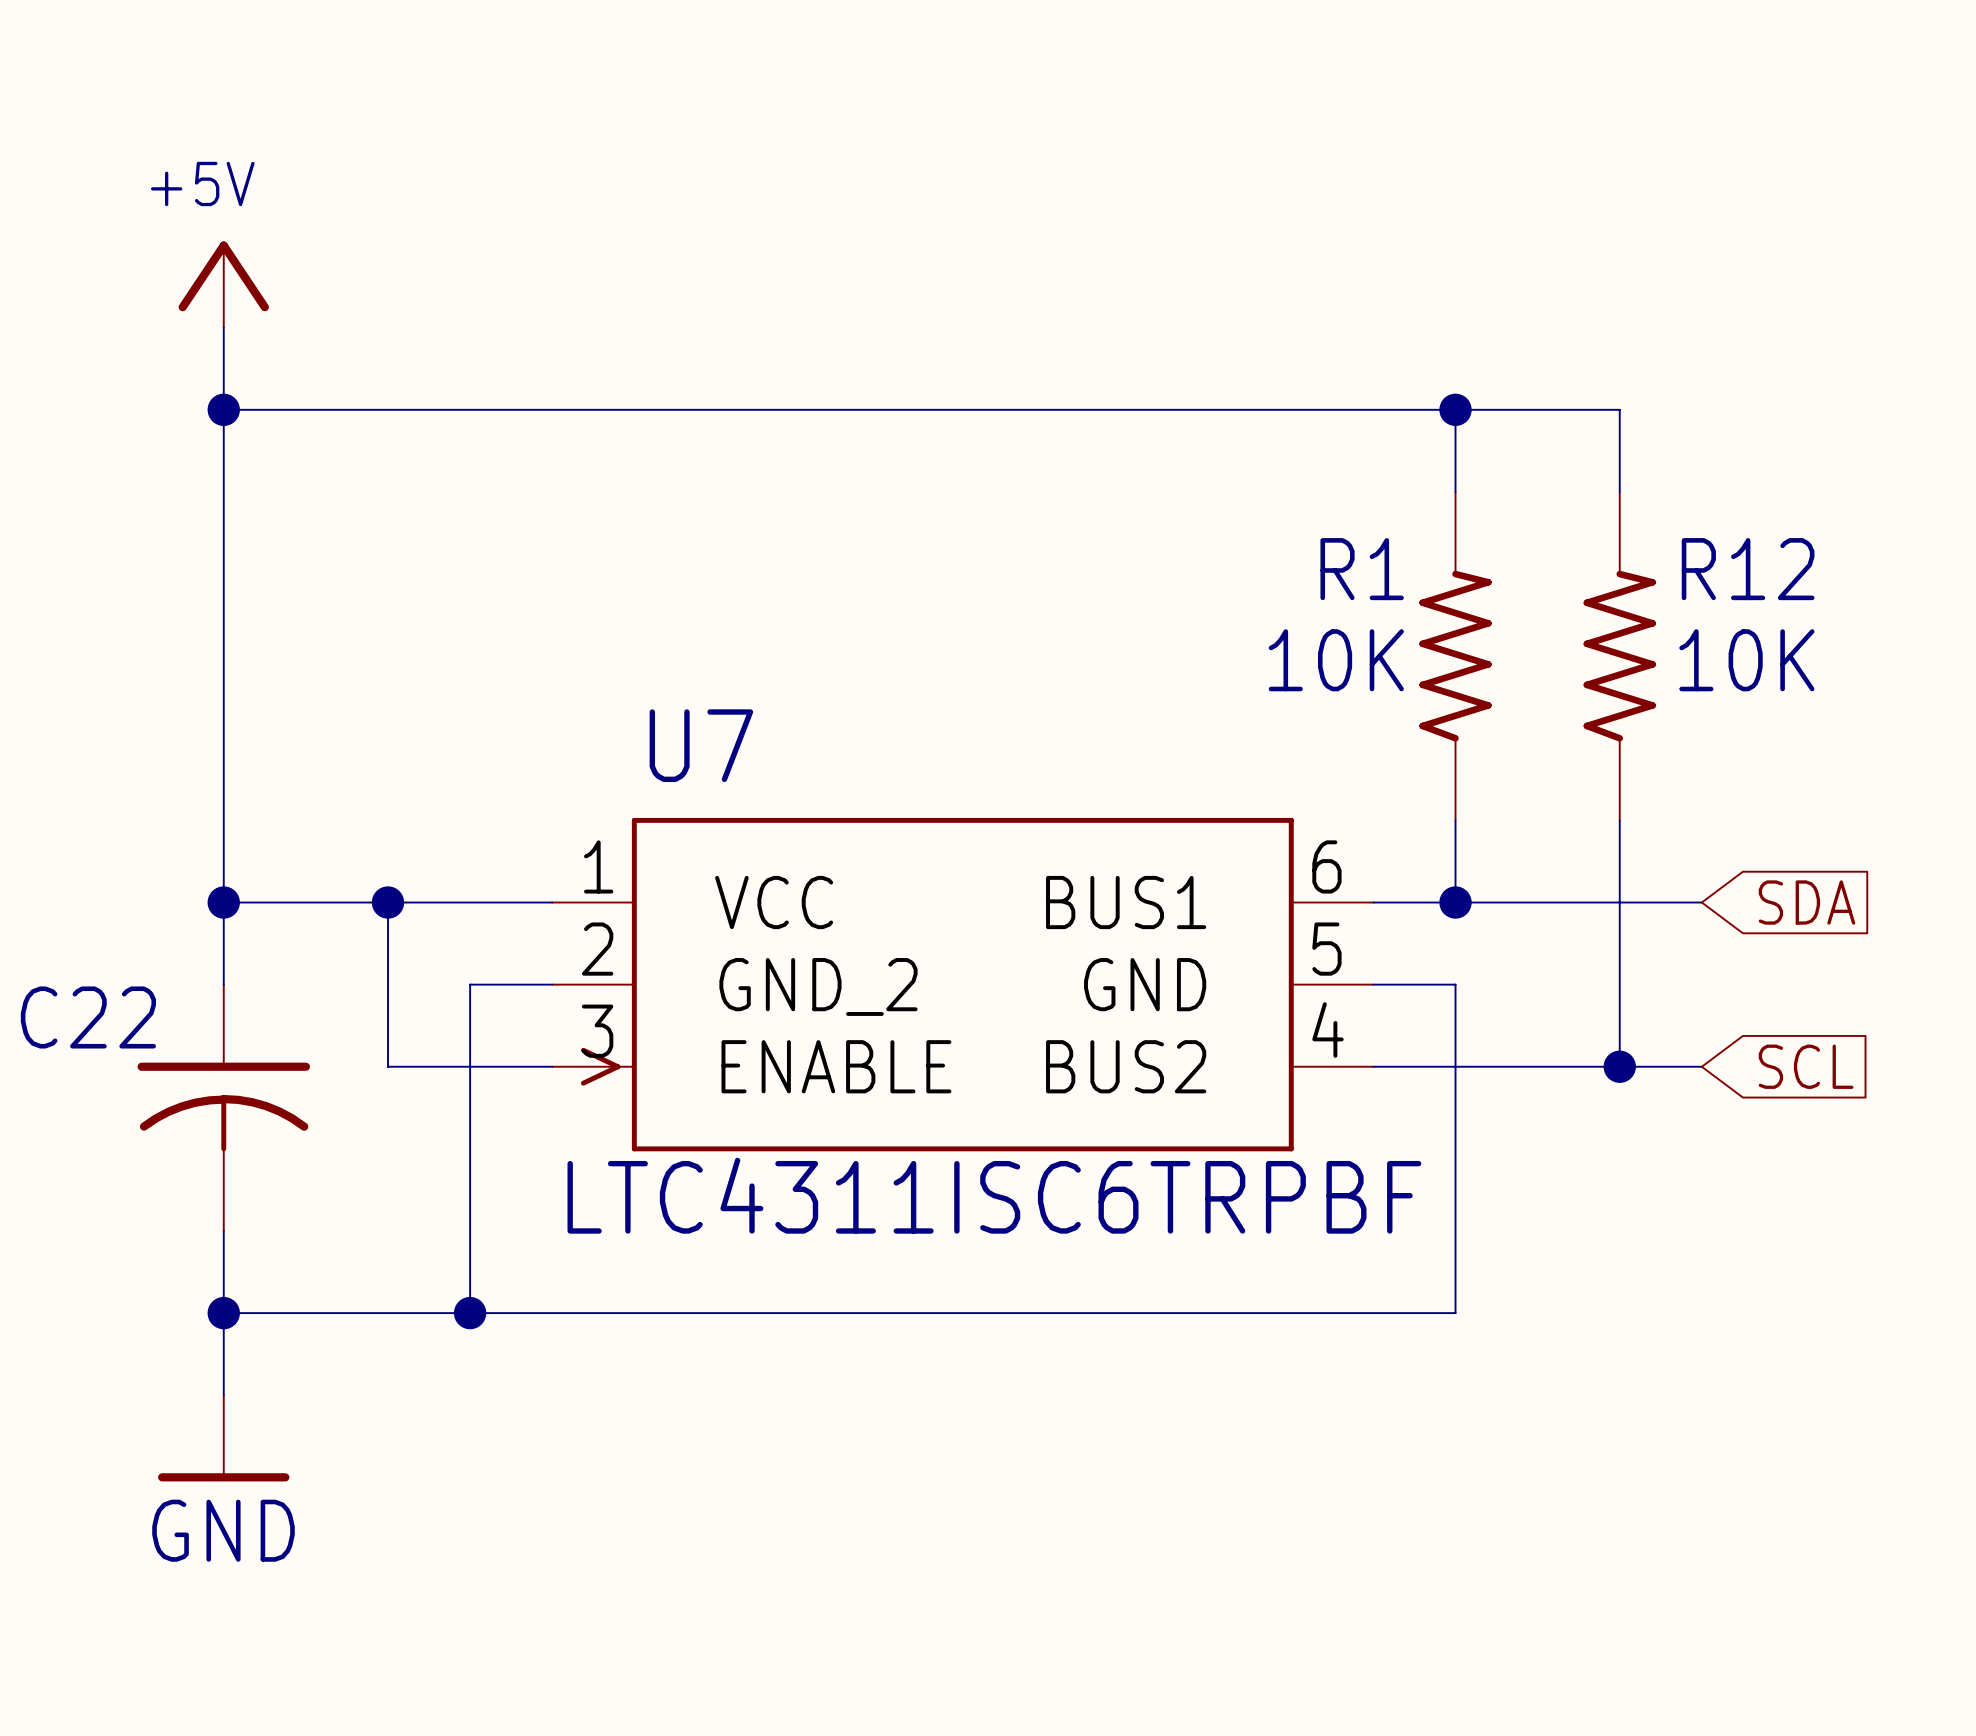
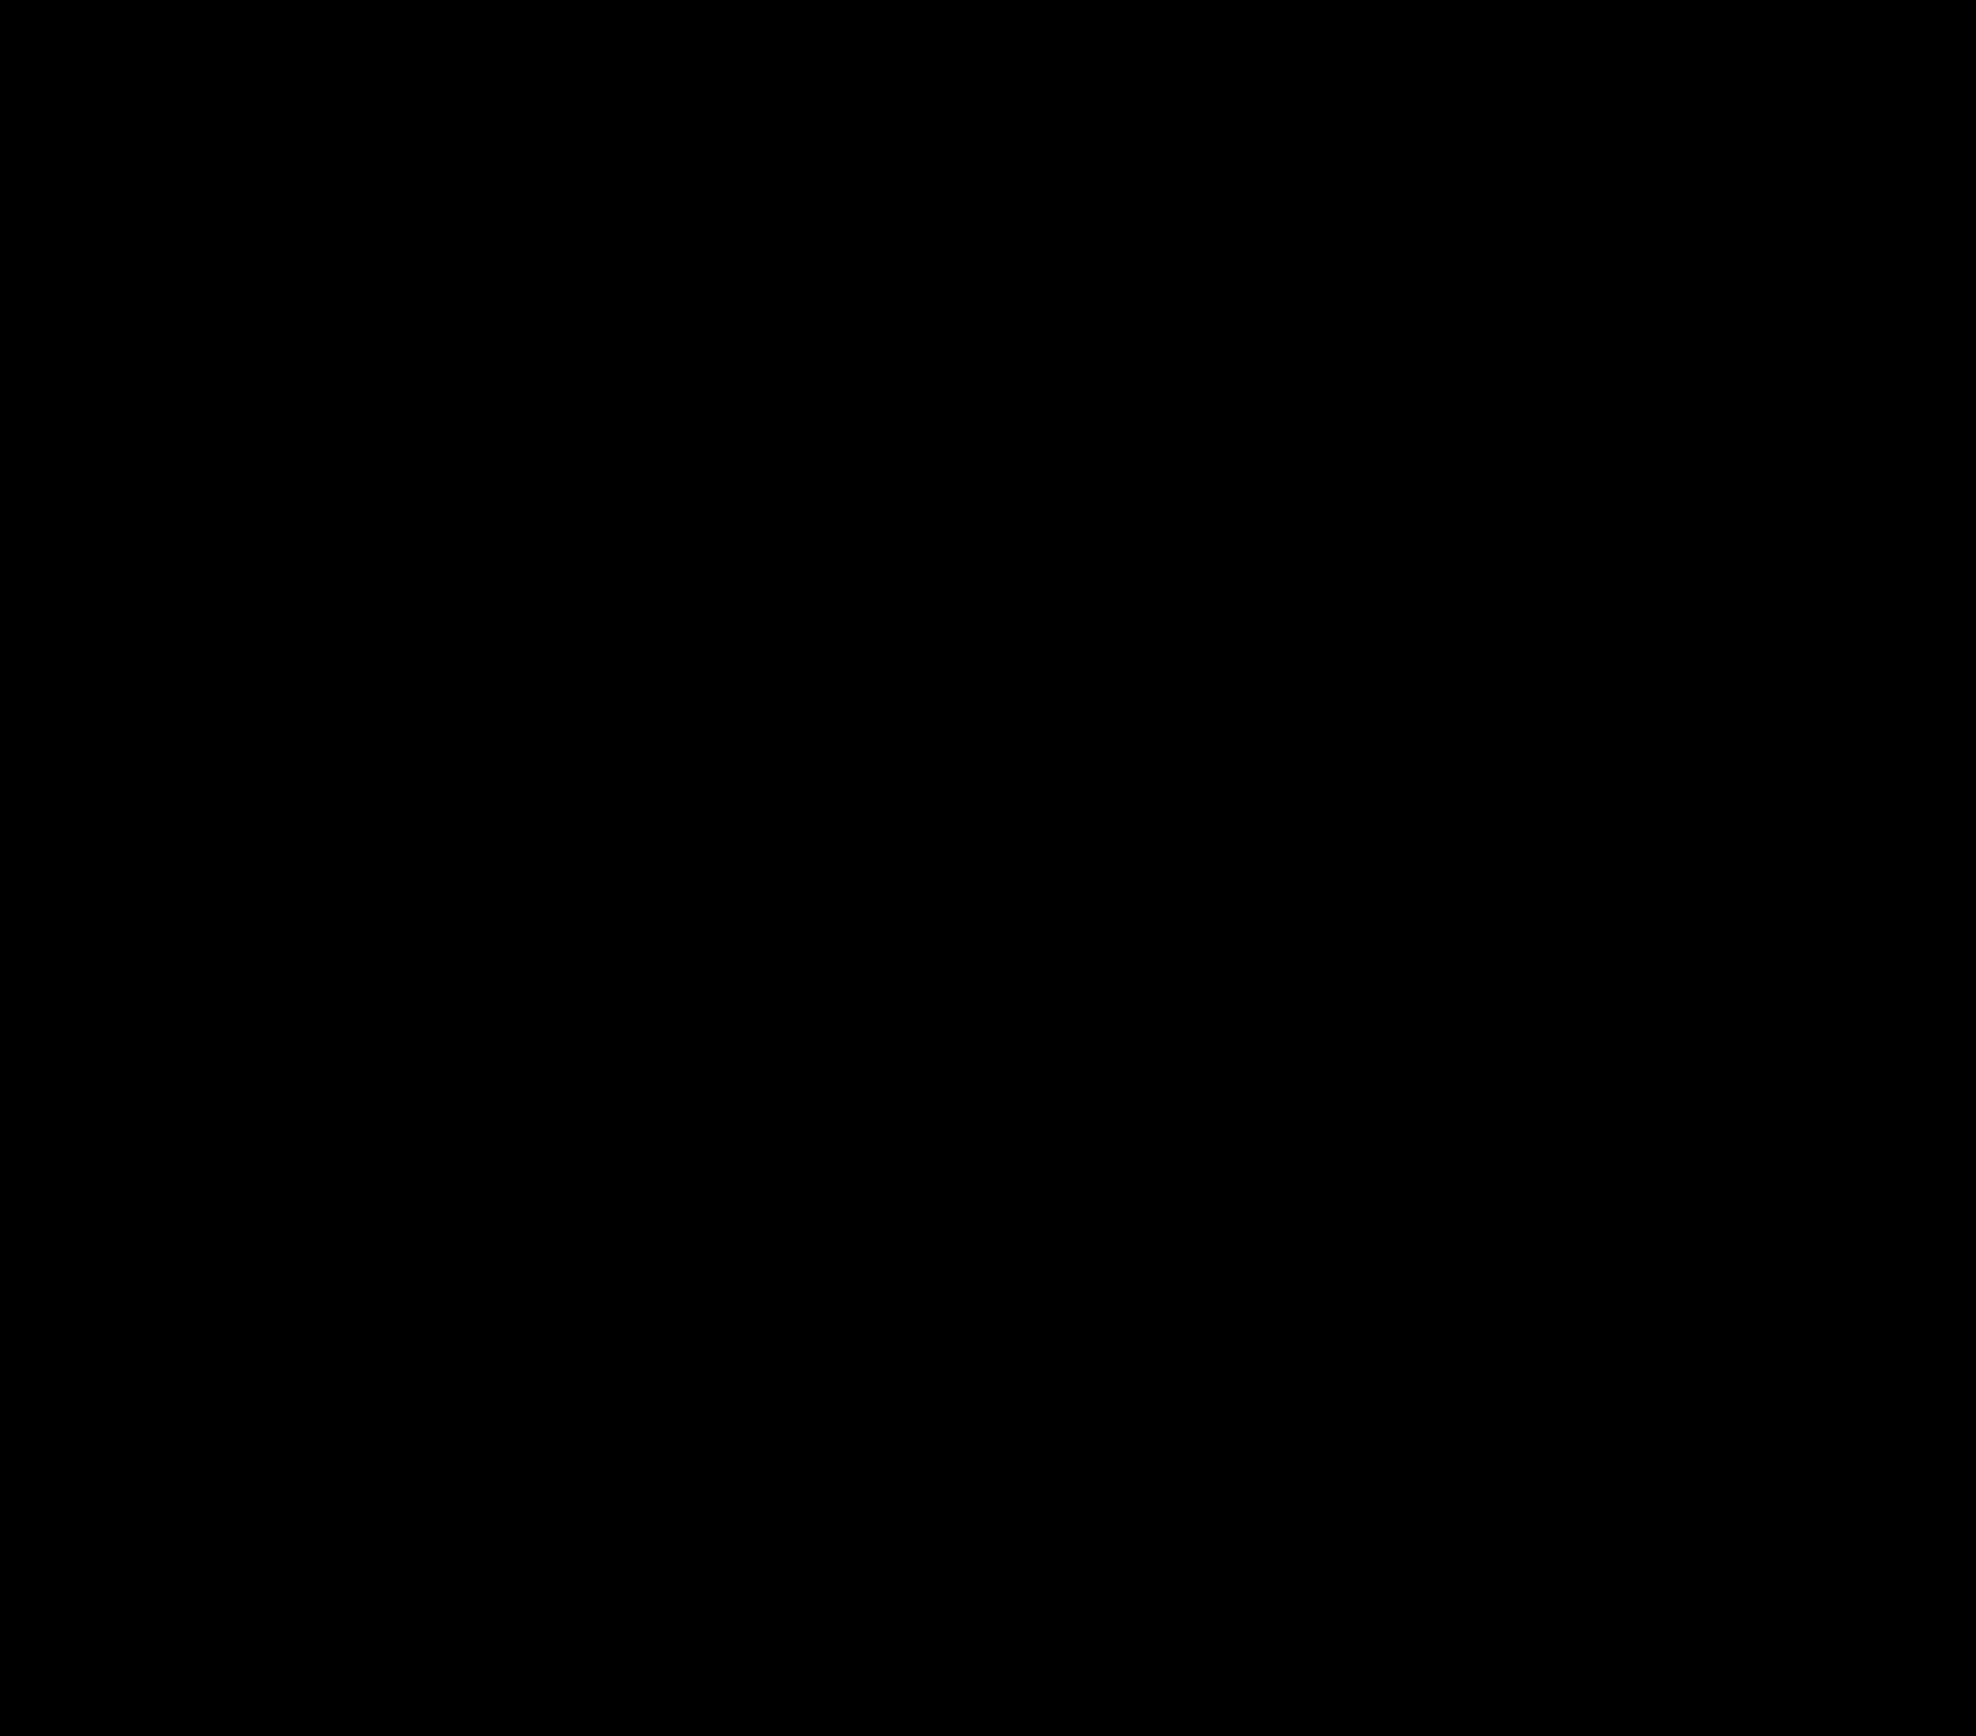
power symbol: +5V (223, 284) -> none
wire: (223, 327) (223, 984) -> none
wire: (223, 409) (1619, 409) (1619, 491) -> none
junction: (223, 409) -> none
wire: (1455, 409) (1455, 491) -> none
junction: (1455, 409) -> none
R1: 10K (1455, 656) -> none
R12: 10K (1619, 656) -> none
wire: (1455, 820) (1455, 902) -> none
wire: (1619, 820) (1619, 1066) -> none
wire: (223, 902) (552, 902) -> none
junction: (223, 902) -> none
wire: (387, 902) (387, 1066) (552, 1066) -> none
junction: (387, 902) -> none
wire: (1373, 902) (1701, 902) -> none
junction: (1455, 902) -> none
global label: SDA (1806, 902) -> none
wire: (552, 984) (470, 984) (470, 1313) -> none
U7: LTC4311ISC6TRPBF (962, 984) -> none
wire: (1373, 984) (1455, 984) (1455, 1313) (223, 1313) -> none
wire: (1373, 1066) (1701, 1066) -> none
junction: (1619, 1066) -> none
global label: SCL (1806, 1066) -> none
C22: (223, 1107) -> none
wire: (223, 1230) (223, 1395) -> none
junction: (223, 1313) -> none
junction: (470, 1313) -> none
power symbol: GND (223, 1438) -> none

